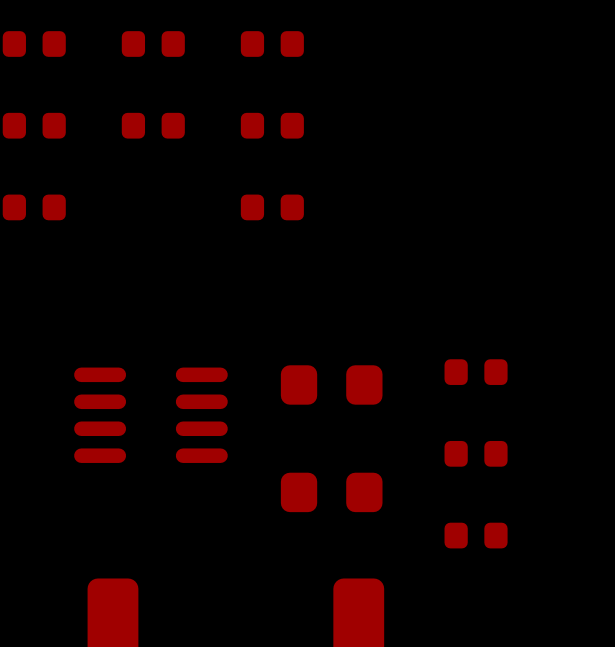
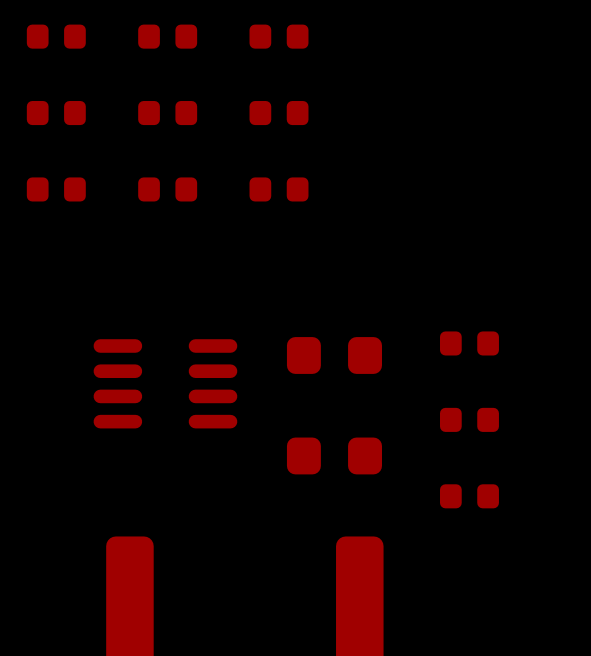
part: none -> (167, 189)

